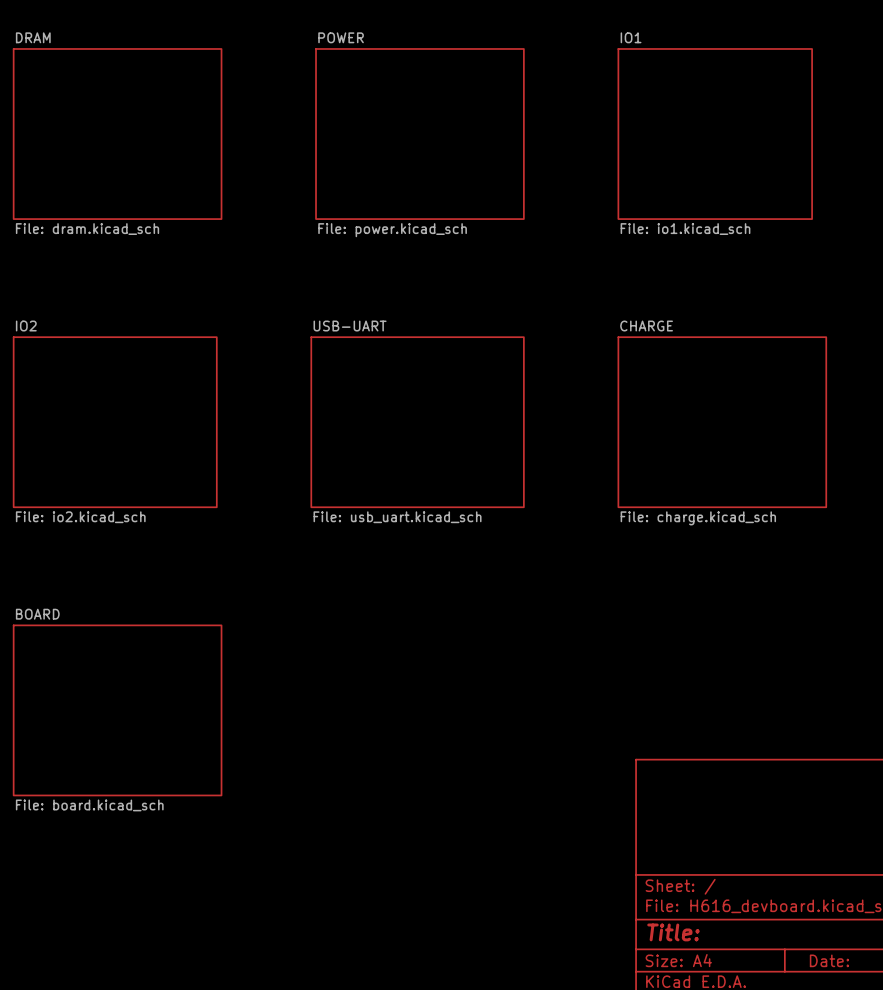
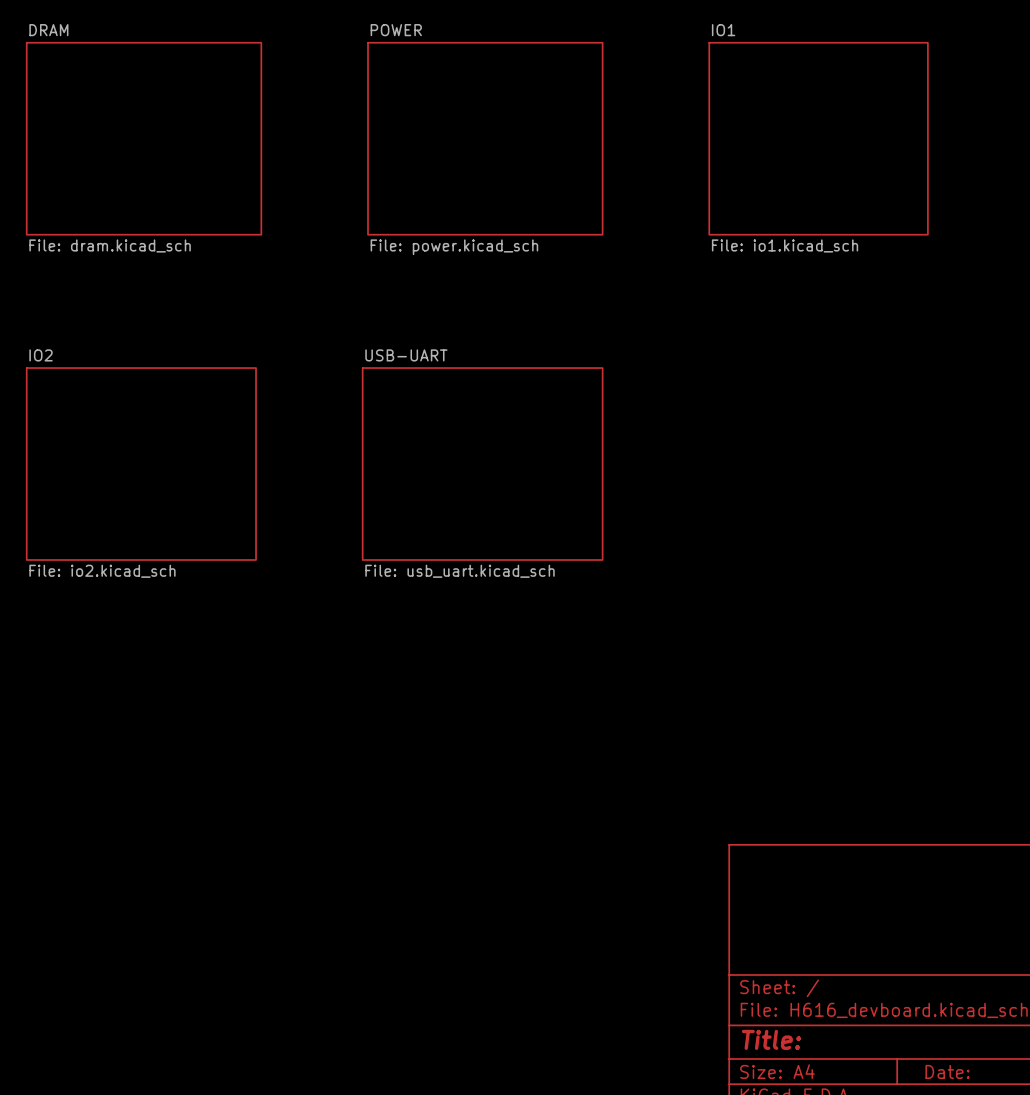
sheet CHARGE: File: charge.kicad_sch (722, 422) -> none
sheet BOARD: File: board.kicad_sch (117, 710) -> none

